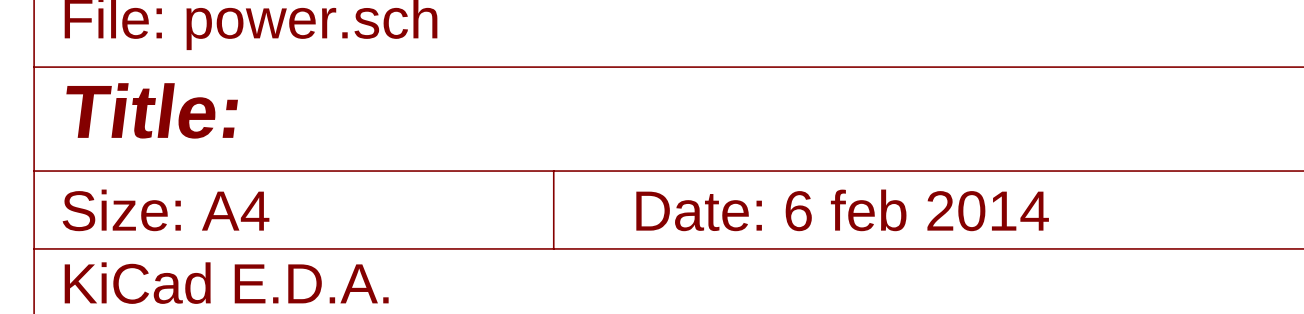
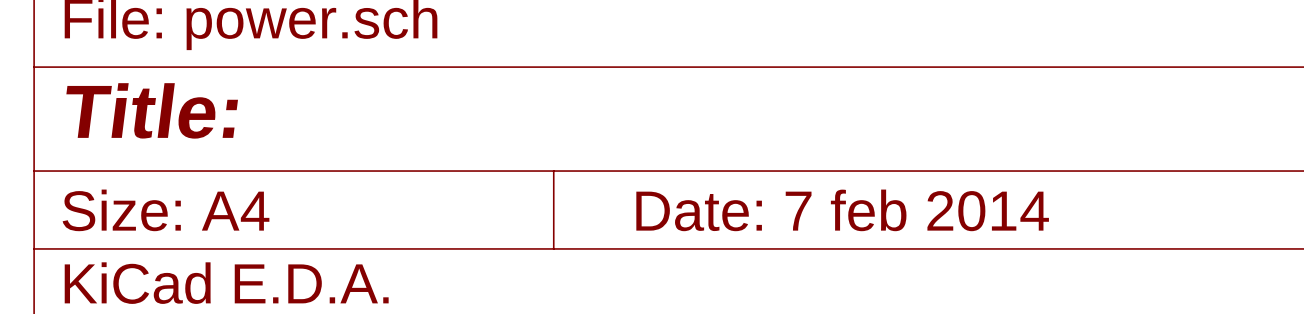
title block: Date: 6 feb 2014 (842, 210) -> Date: 7 feb 2014 (842, 210)

